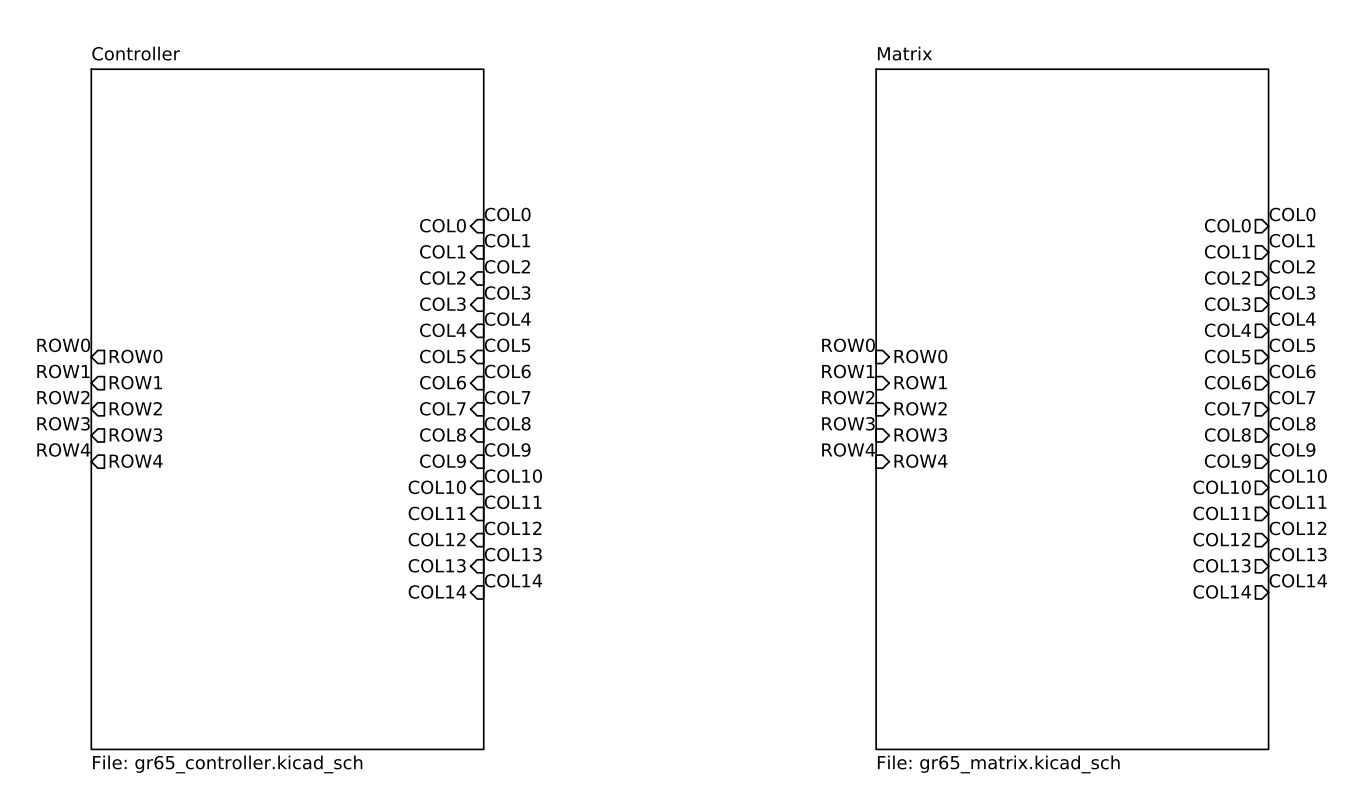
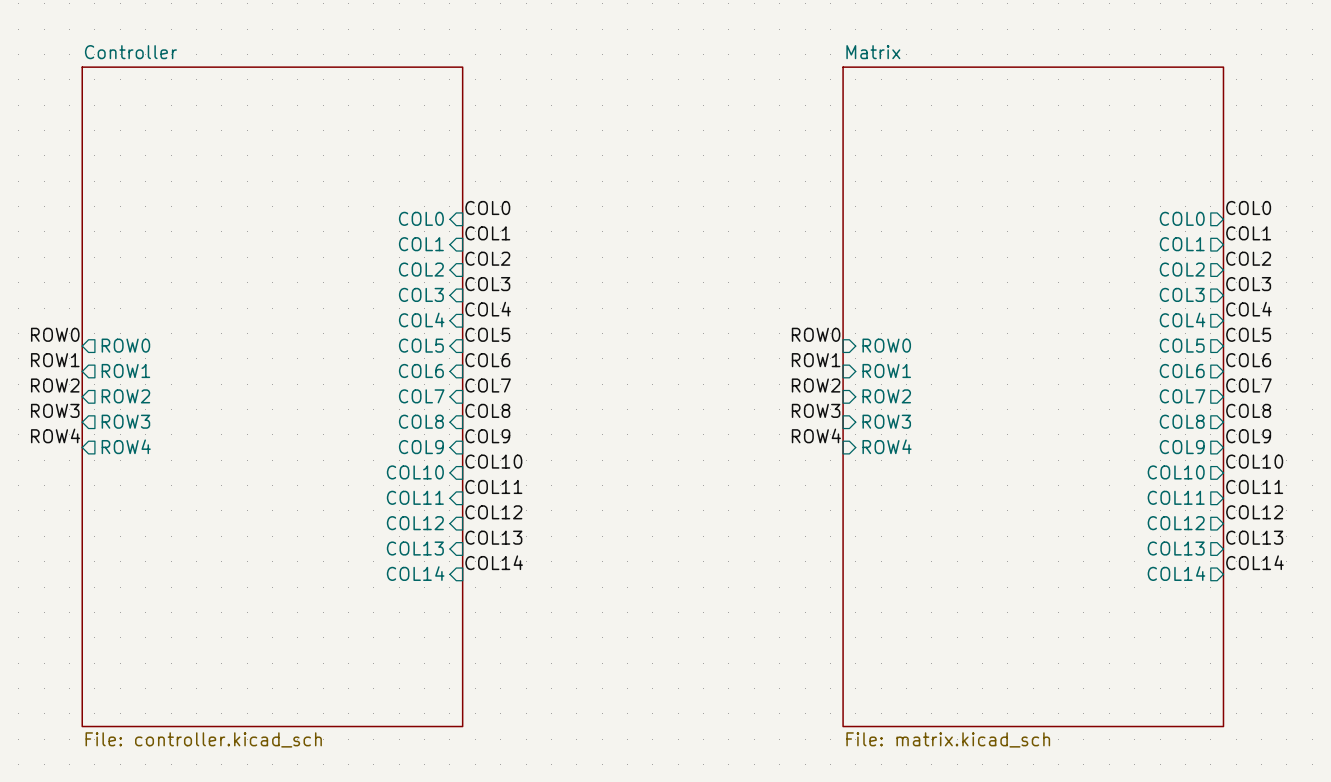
sheet Controller value: File: gr65_controller.kicad_sch (227, 764) -> File: controller.kicad_sch (203, 739)
sheet Matrix value: File: gr65_matrix.kicad_sch (998, 764) -> File: matrix.kicad_sch (948, 739)

